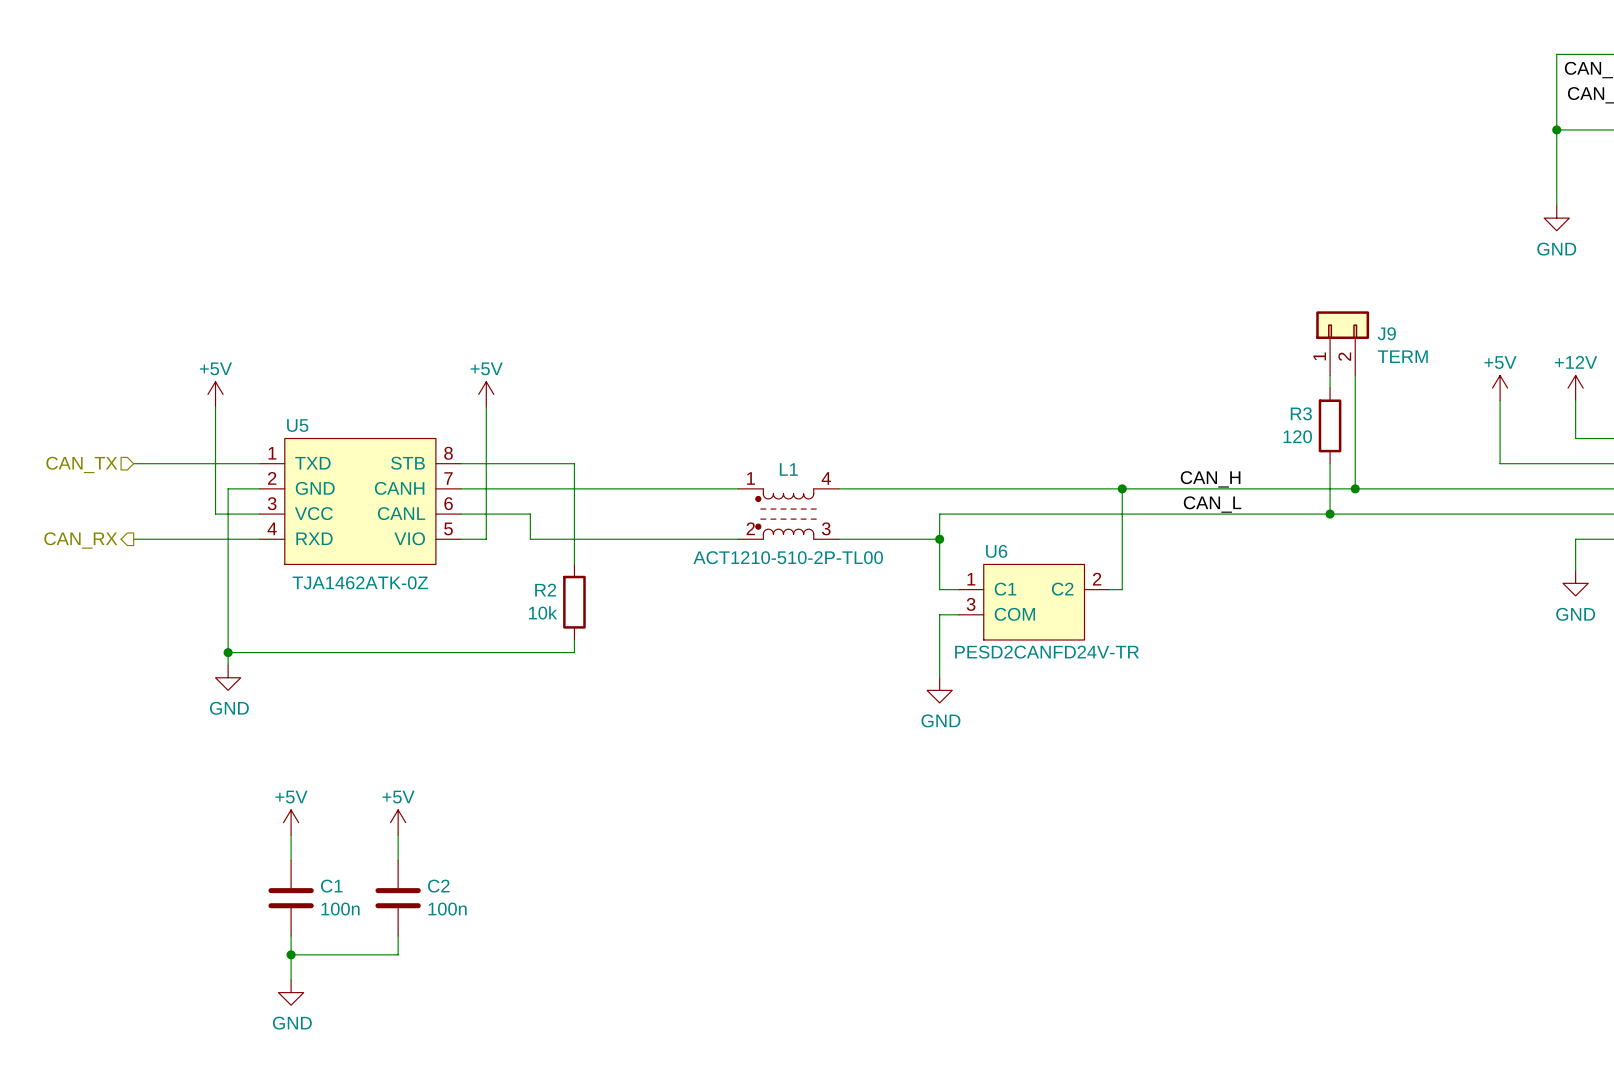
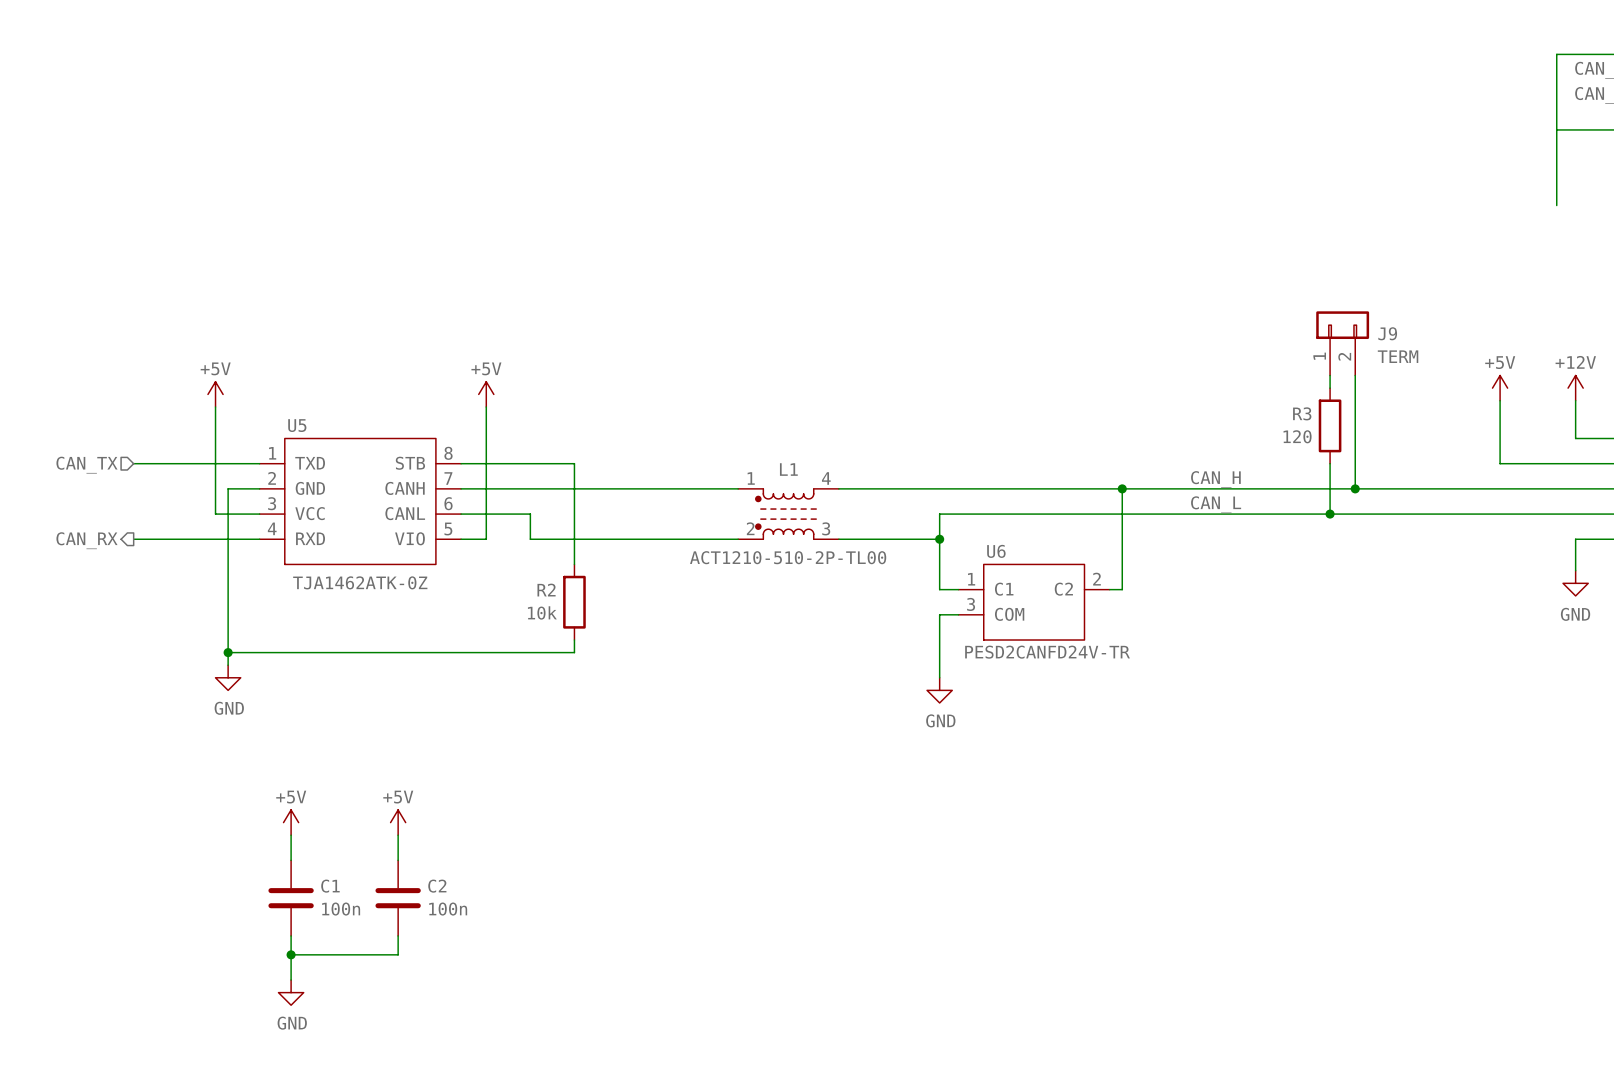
junction: (1556, 129) -> none
power symbol: GND (1556, 218) -> none

